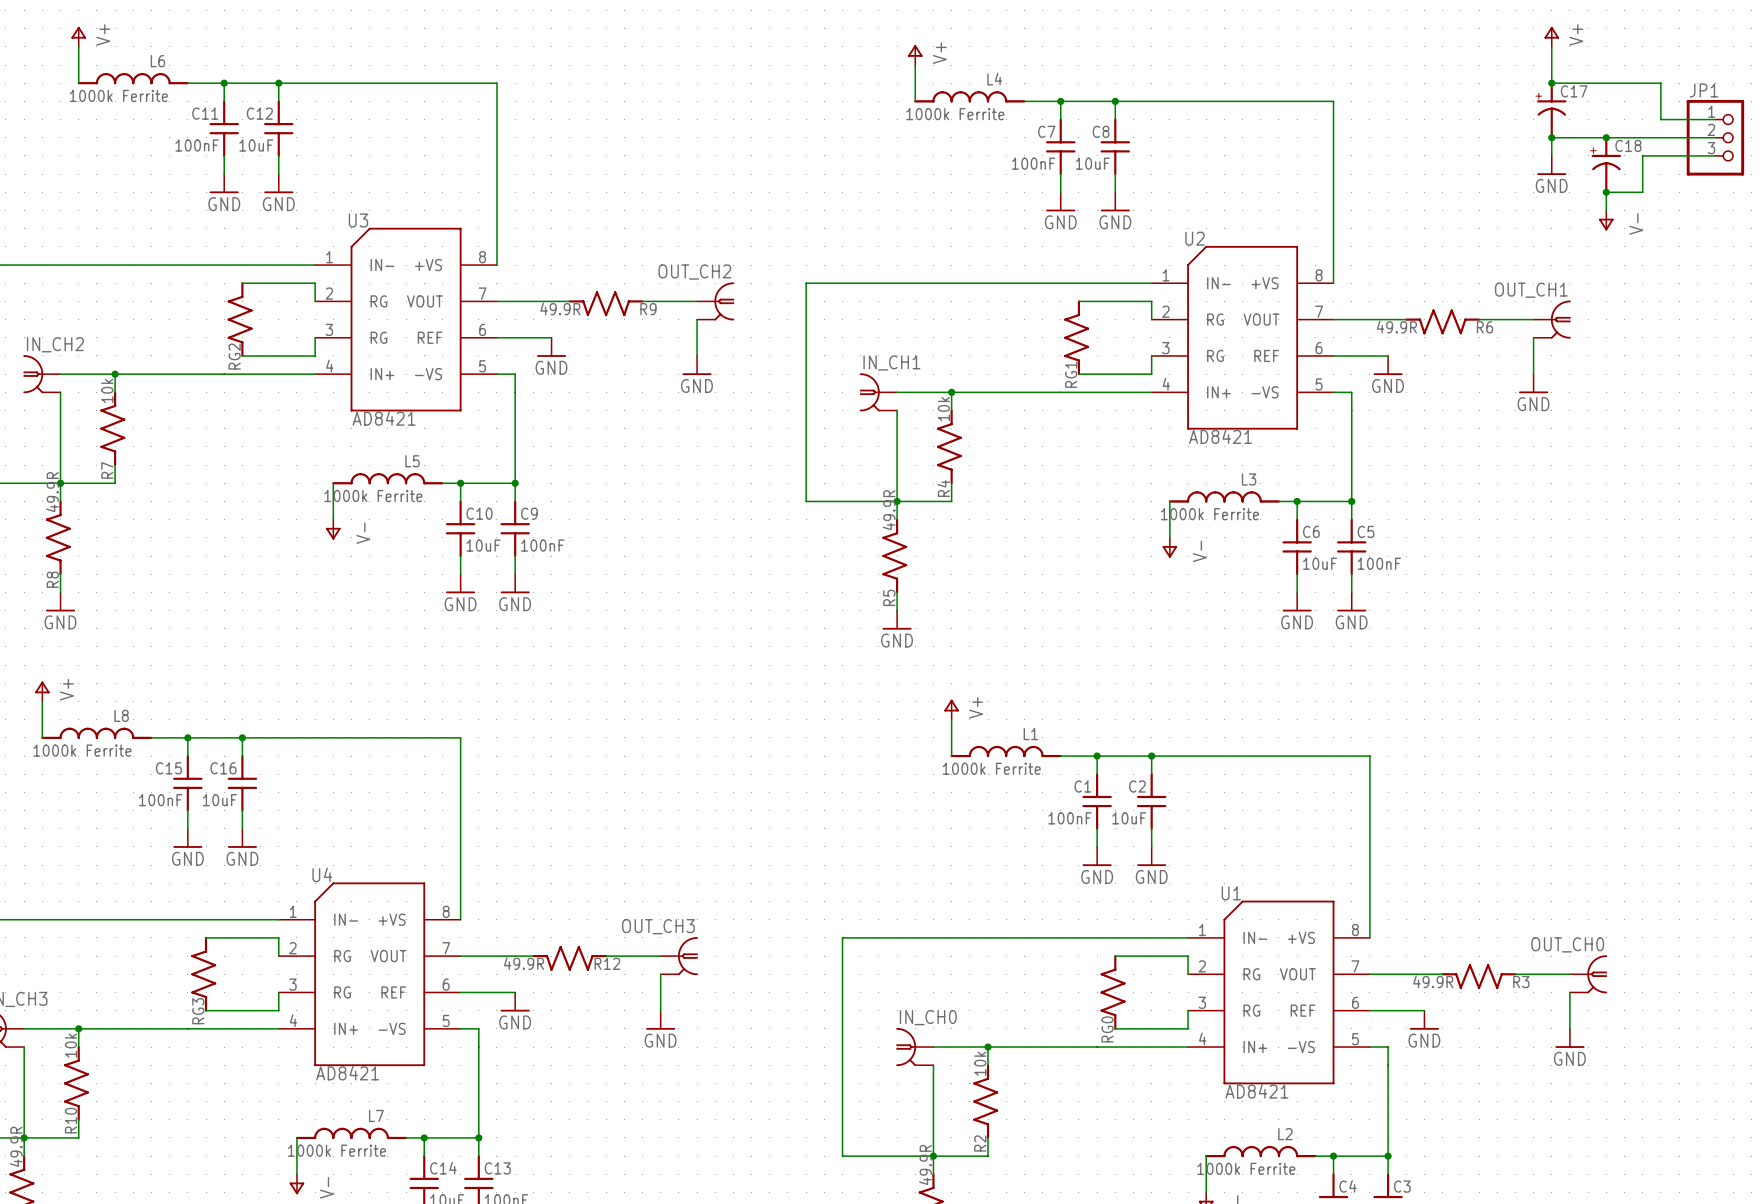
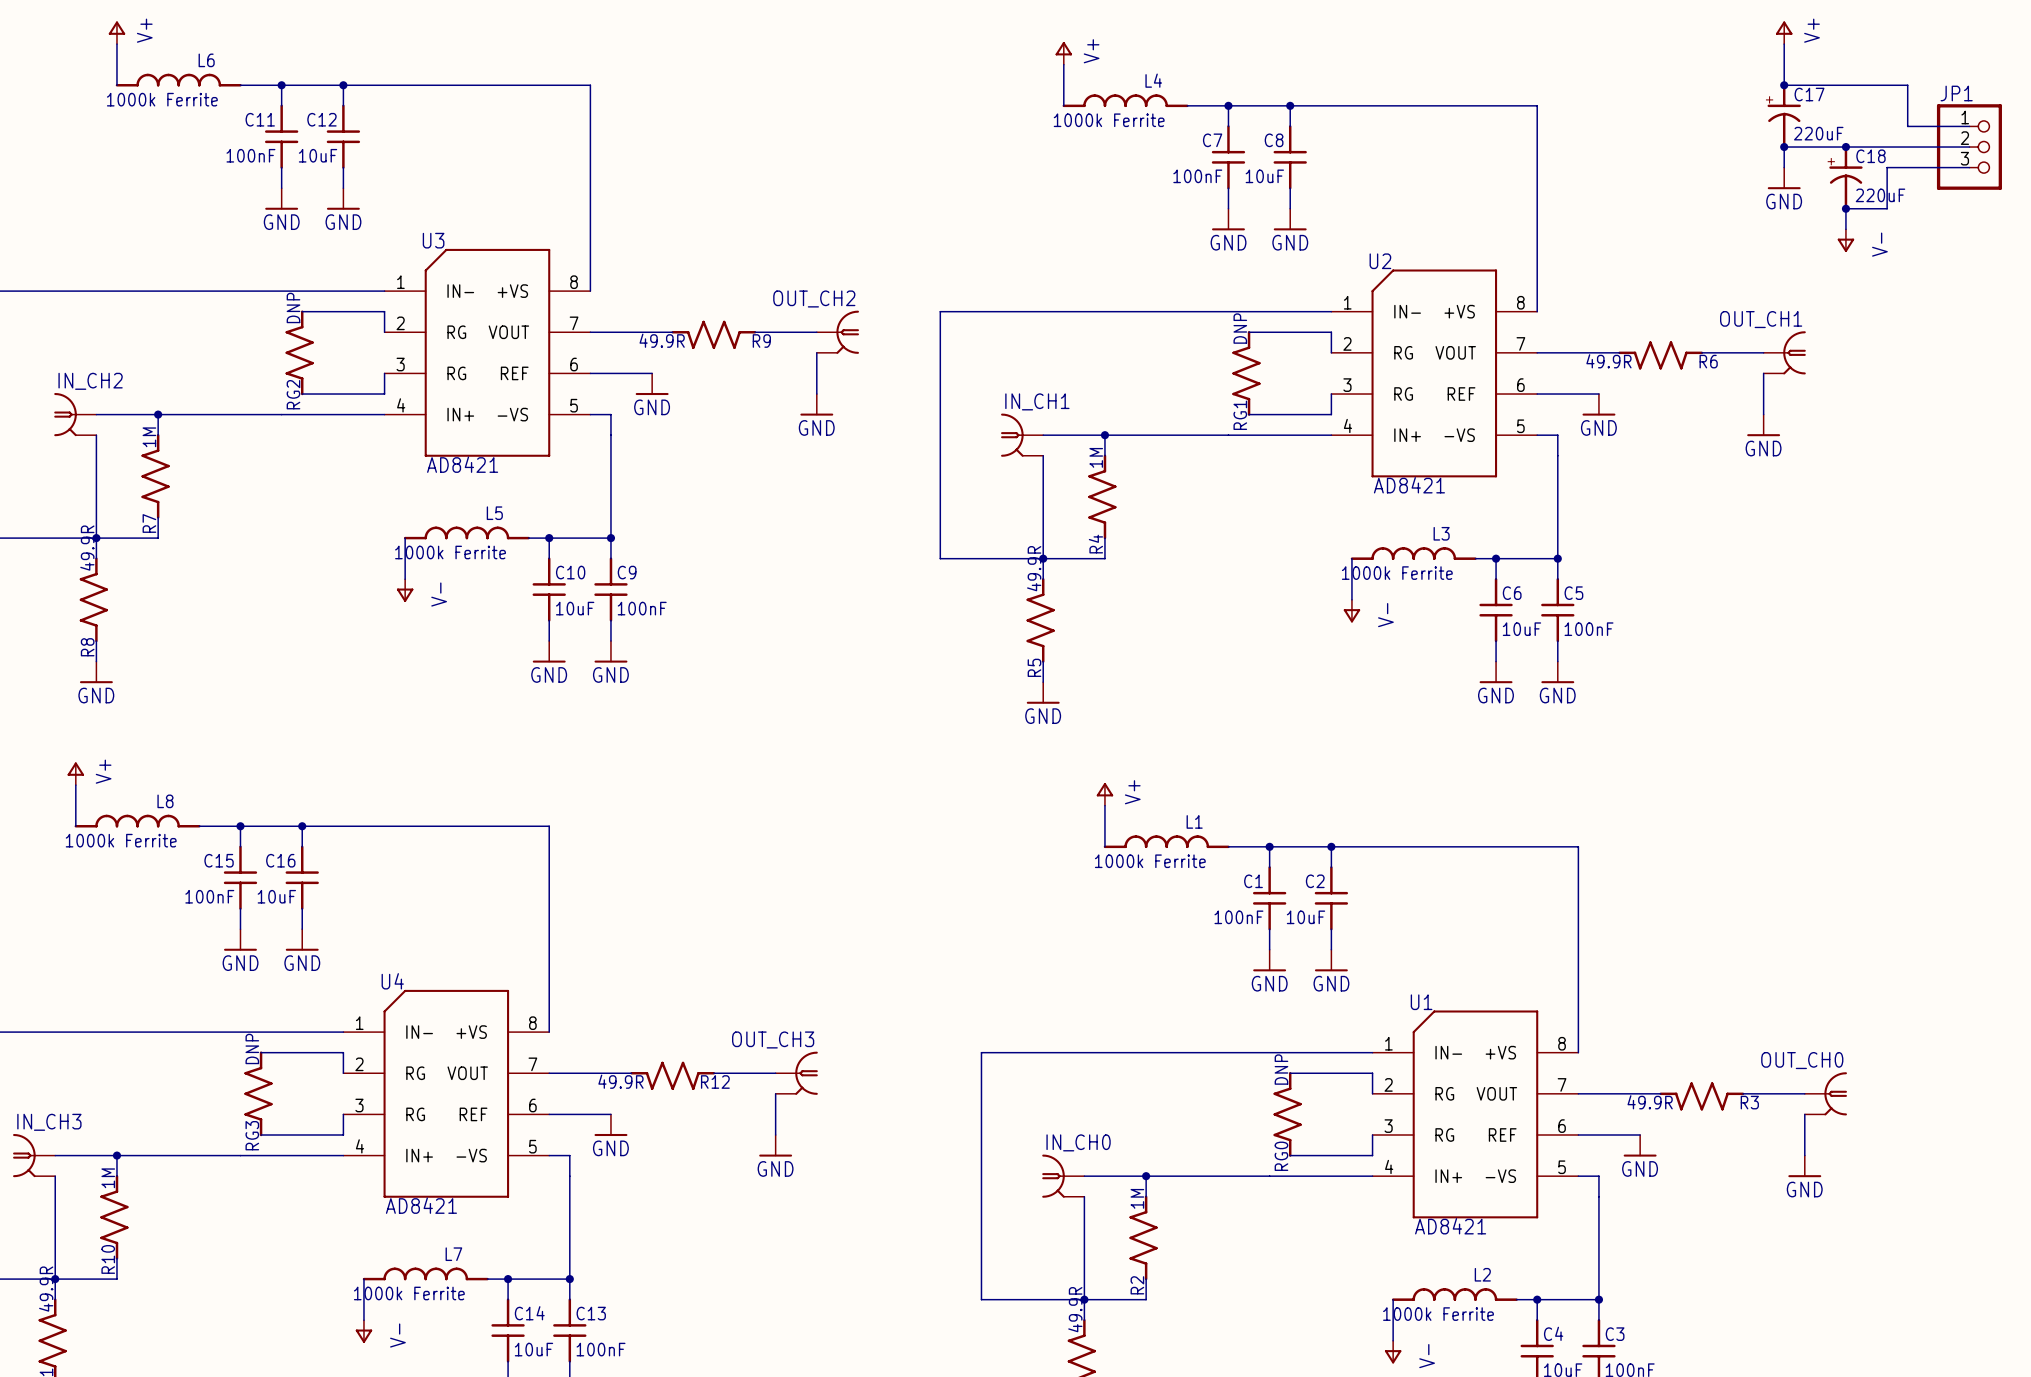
C17 value: none -> 220uF (1818, 133)
C18 value: none -> 220uF (1880, 195)
RG2 value: none -> DNP (293, 307)
RG1 value: none -> DNP (1240, 328)
R7 value: 10k (107, 390) -> 1M (149, 437)
R4 value: 10k (943, 409) -> 1M (1096, 457)
RG3 value: none -> DNP (252, 1048)
RG0 value: none -> DNP (1281, 1069)
R10 value: 10k (71, 1045) -> 1M (108, 1178)
R2 value: 10k (980, 1063) -> 1M (1137, 1198)

